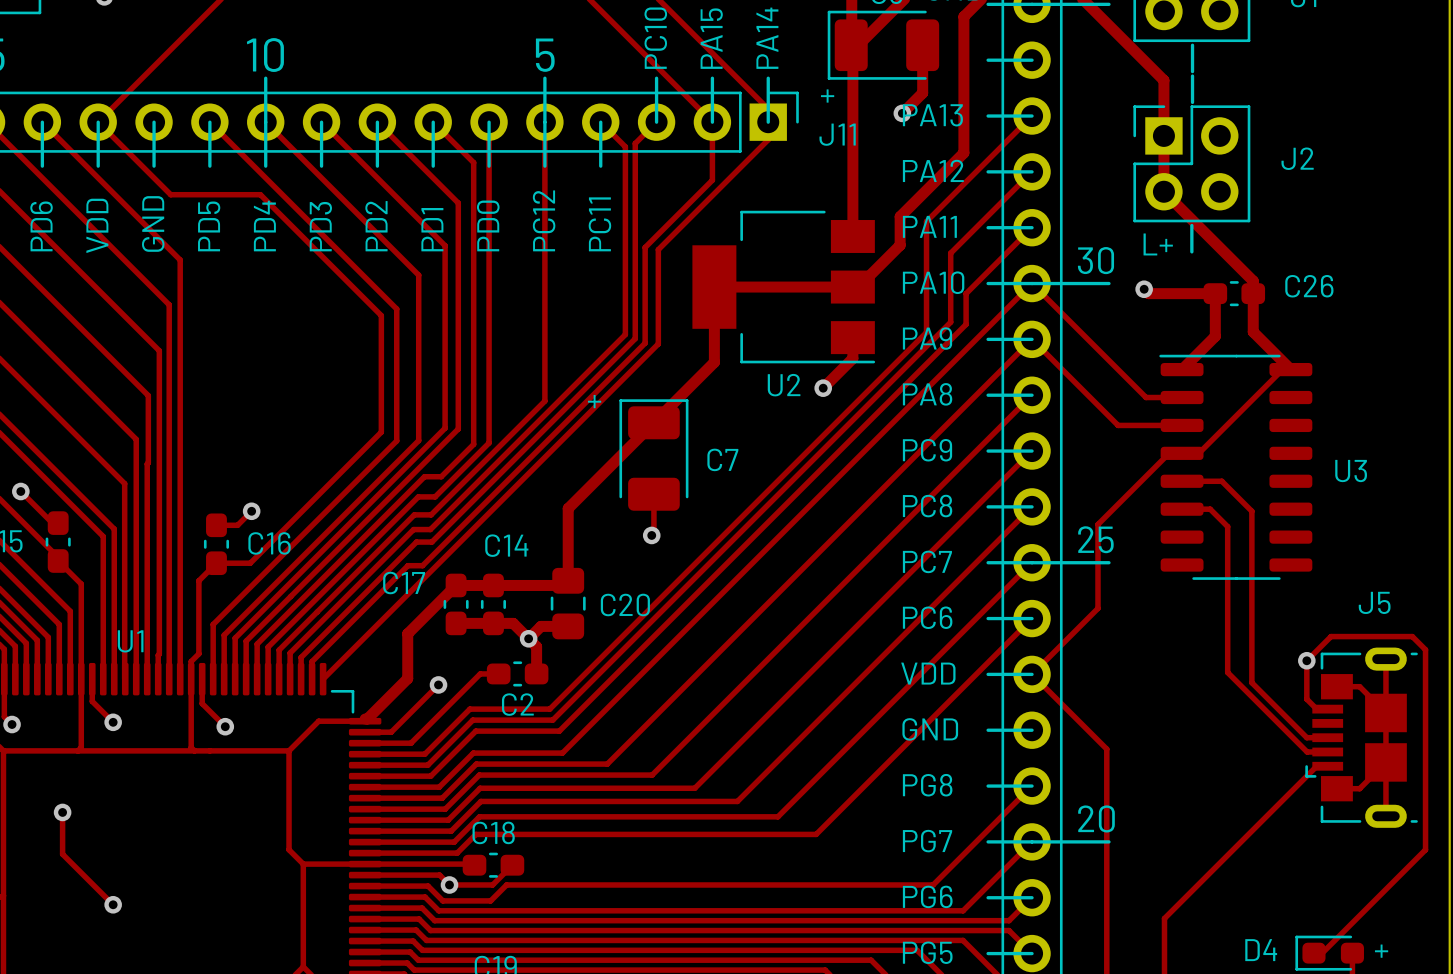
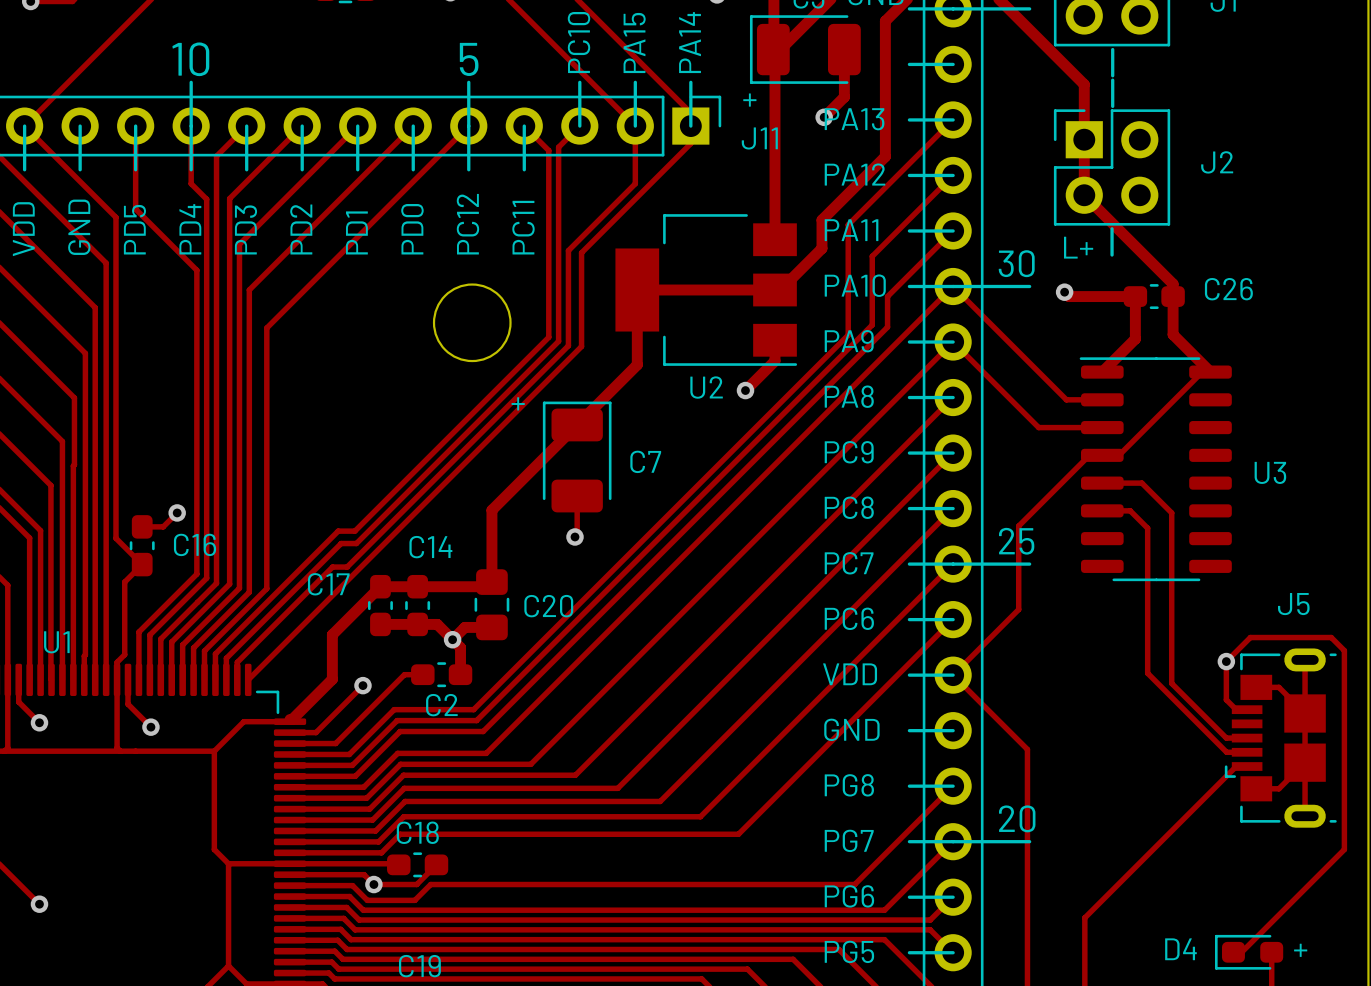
track: (209, 122) (396, 309) (396, 440) (213, 624) (213, 631) -> (135, 126) (135, 209) (196, 270) (196, 574) (138, 632)
track: (265, 122) (418, 275) (418, 440) (224, 635) -> (191, 126) (191, 183) (206, 199) (206, 578) (149, 636)
track: (321, 122) (445, 245) (445, 428) (291, 582) -> (246, 126) (216, 156) (216, 583)
track: (377, 122) (458, 203) (458, 429) (304, 582) -> (302, 126) (229, 198) (229, 584)
track: (433, 122) (473, 162) (473, 444) (441, 476) (424, 476) (314, 586) -> (357, 126) (239, 244) (239, 588)
track: (489, 122) (489, 442) (435, 496) (418, 496) (324, 591) -> (413, 126) (249, 289) (249, 592)
track: (544, 122) (544, 401) (431, 514) (414, 514) (341, 587) -> (468, 126) (266, 328) (266, 588)
track: (170, 194) (260, 194) (381, 315) (381, 432) (250, 563) (216, 563) -> (96, 198) (115, 217) (115, 538) (142, 564)
round board edge: none -> [432, 283, 512, 363]

